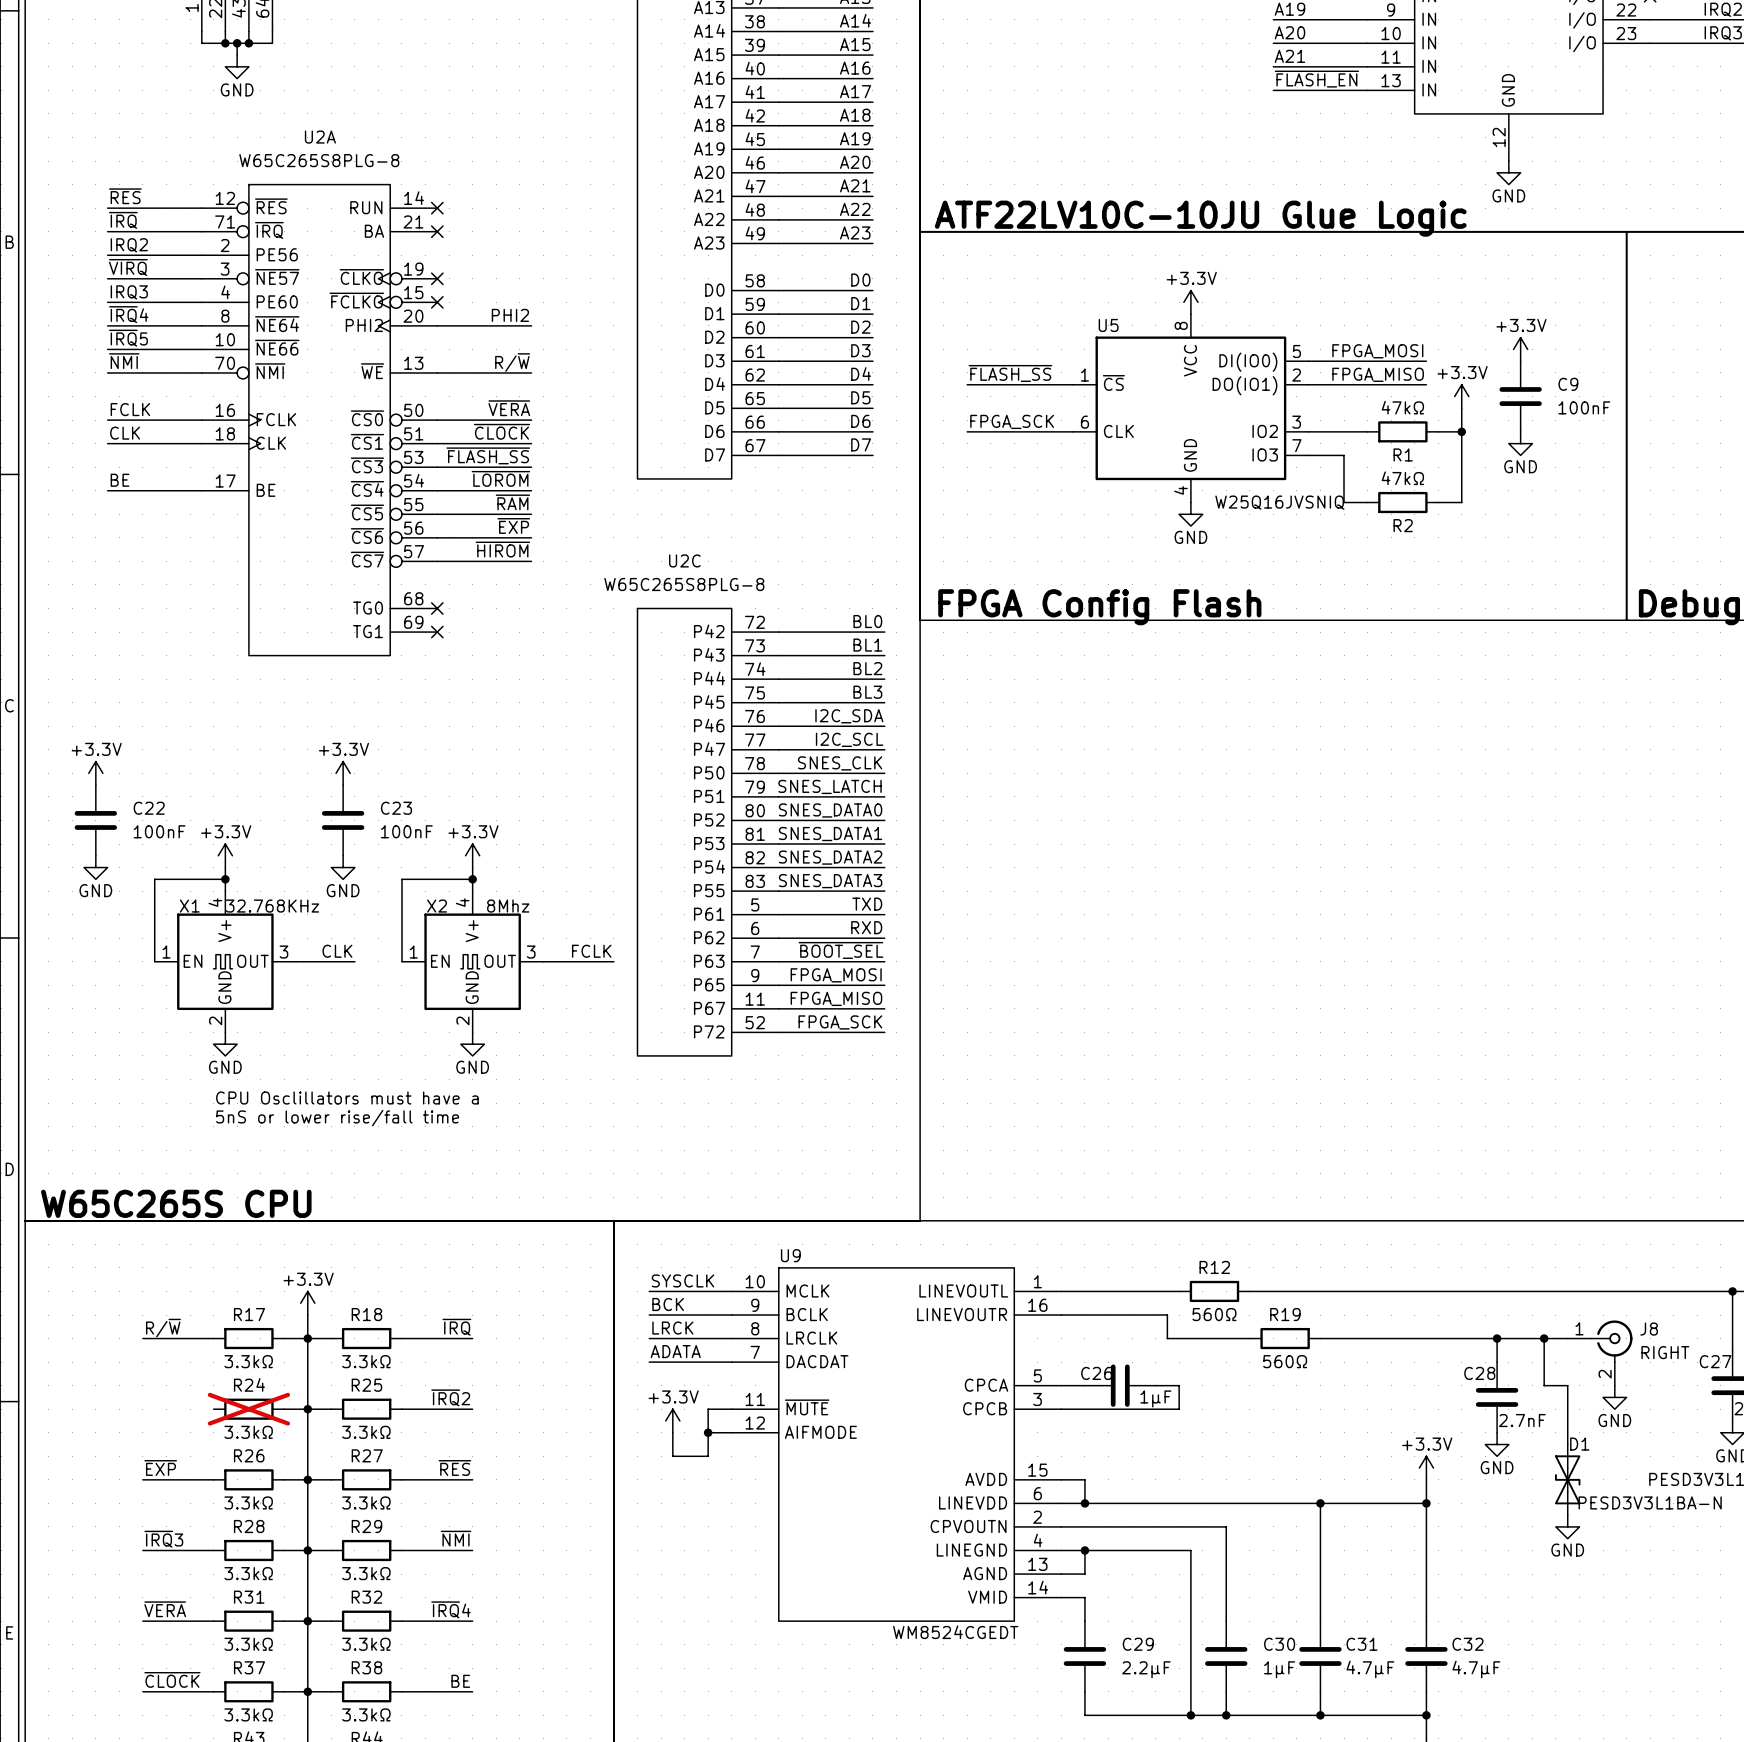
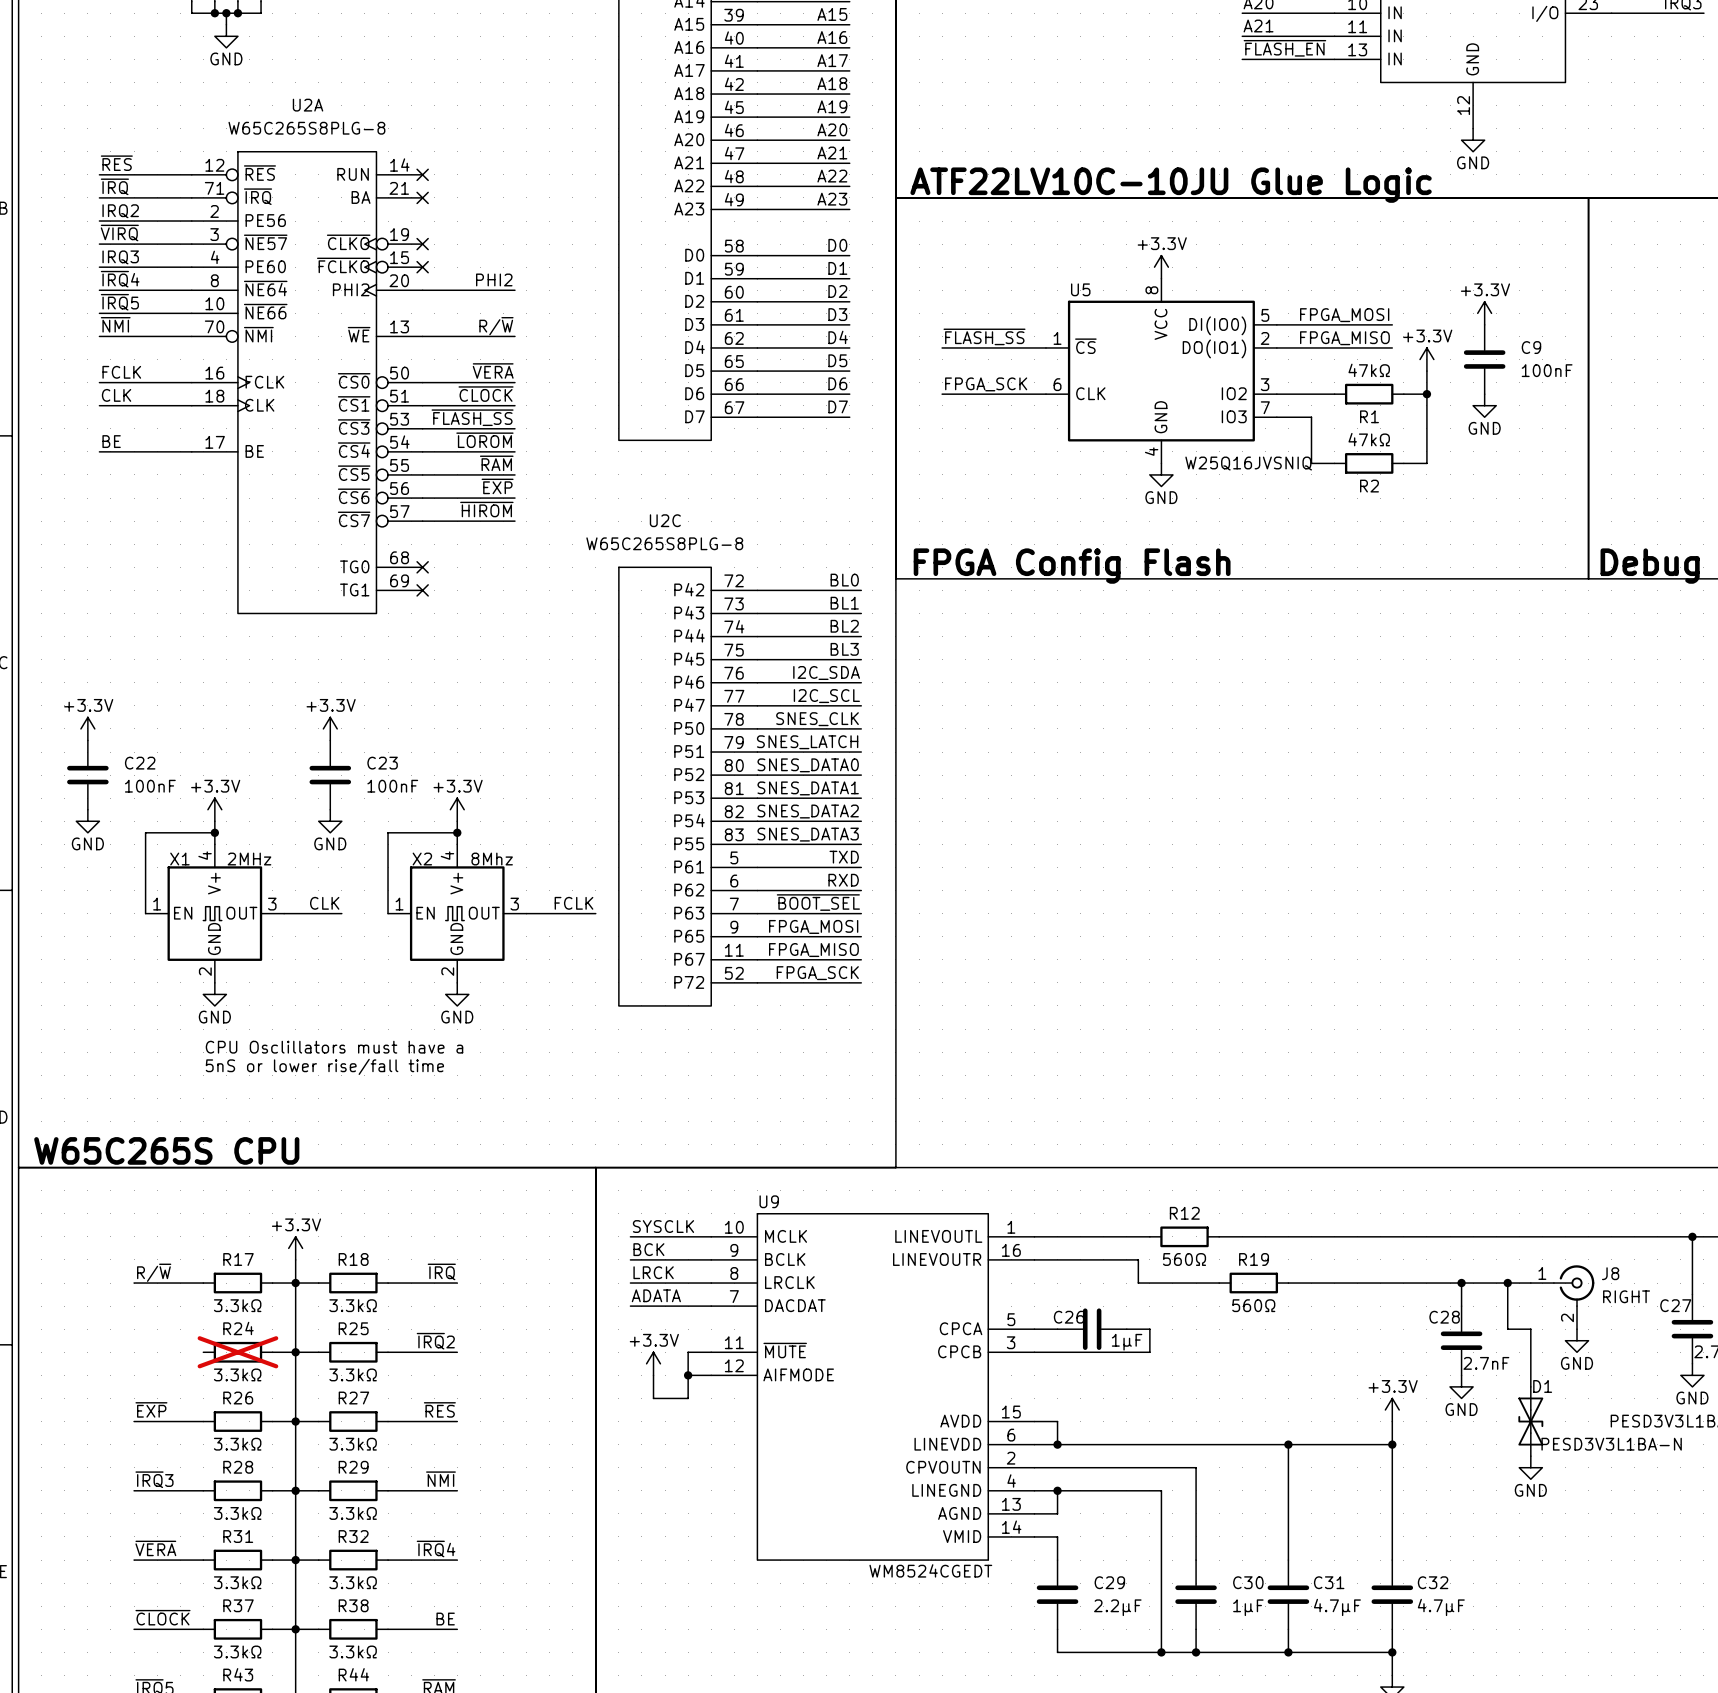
X1 value: 32.768KHz (272, 906) -> 2MHz (249, 859)

